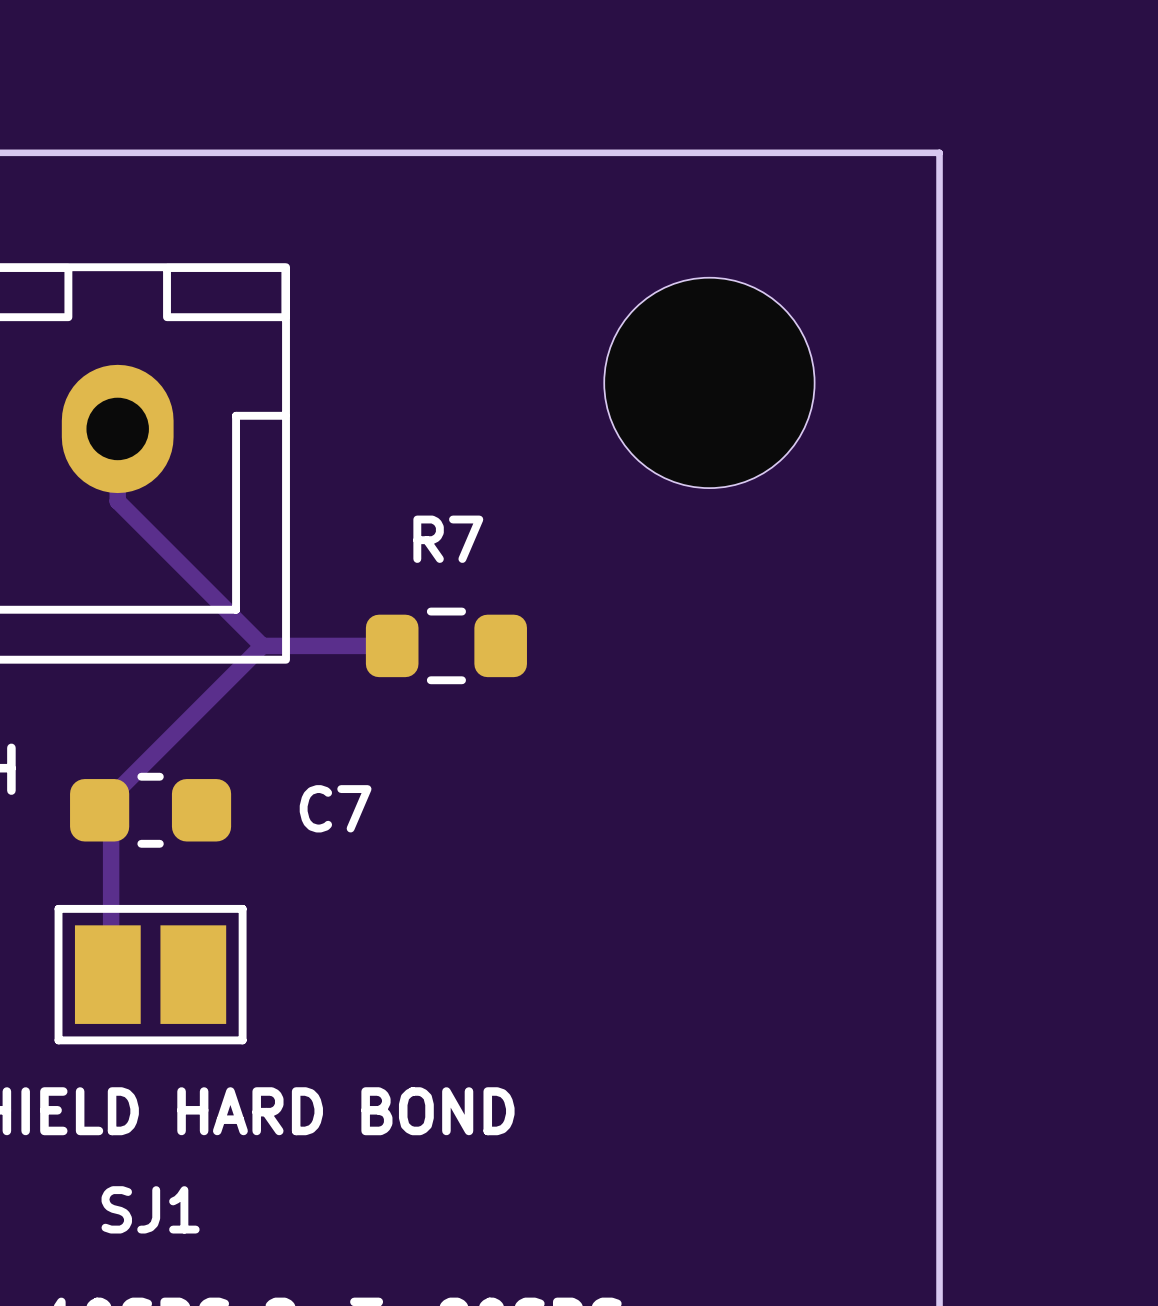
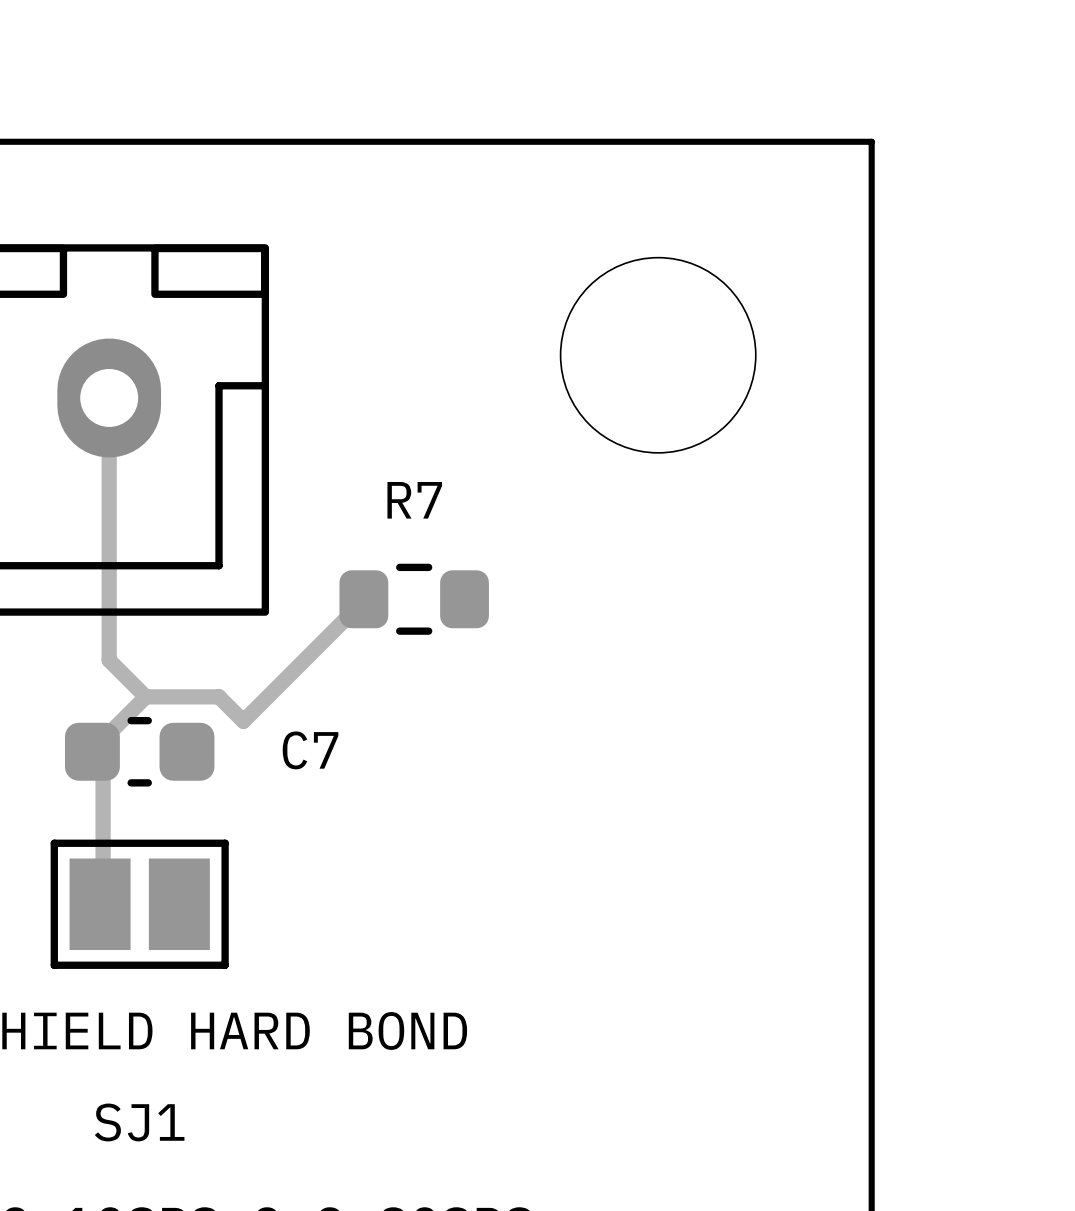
track: (117, 501) (262, 645) -> (109, 465) (109, 660) (145, 696) (219, 696) (243, 721) (365, 599)
track: (262, 645) (157, 751) -> none
track: (262, 645) (392, 645) -> none

